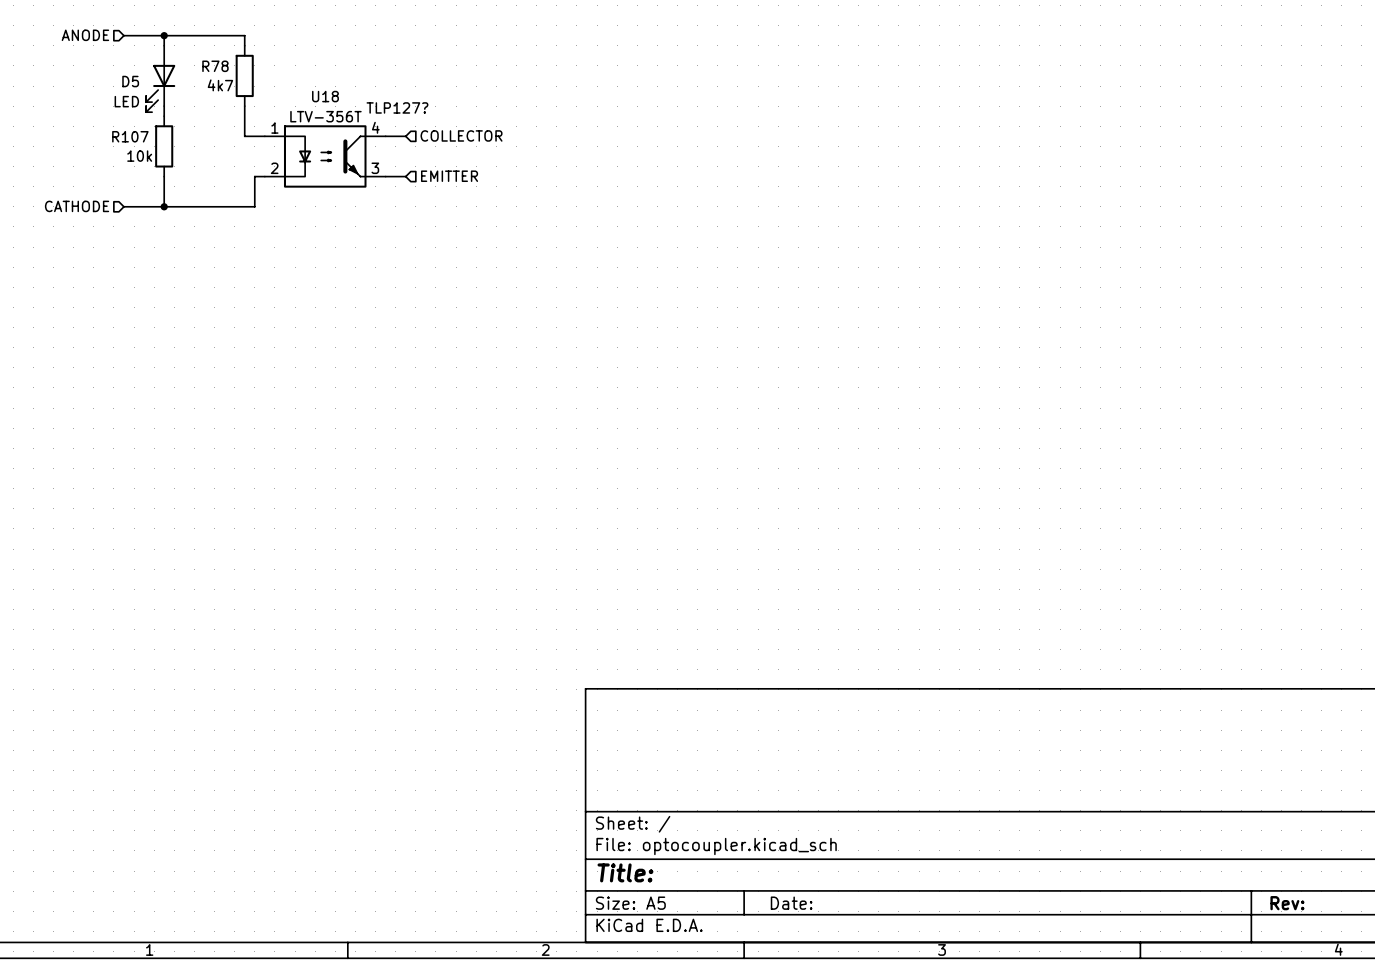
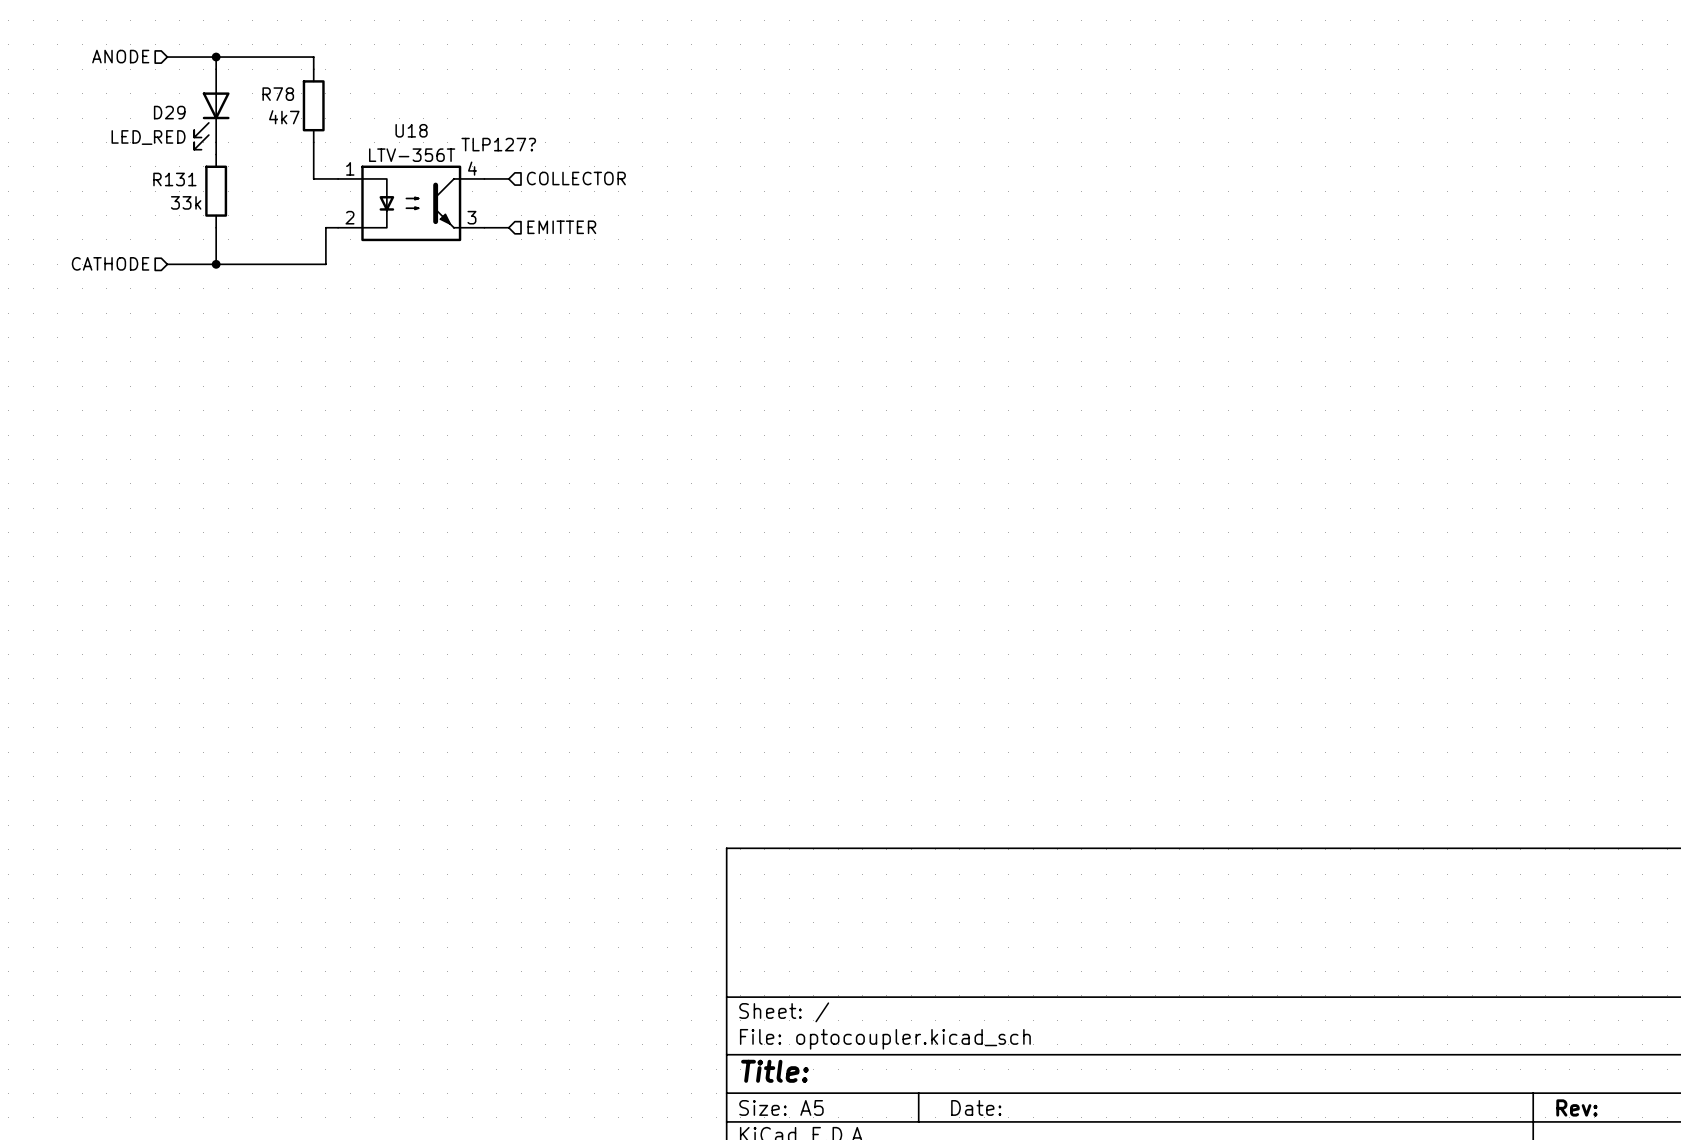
D5 name: D5 (130, 81) -> D29 (169, 112)
D5 value: LED (126, 101) -> LED_RED (148, 137)
R107 name: R107 (130, 136) -> R131 (174, 179)
R107 value: 10k (139, 156) -> 33k (186, 202)

